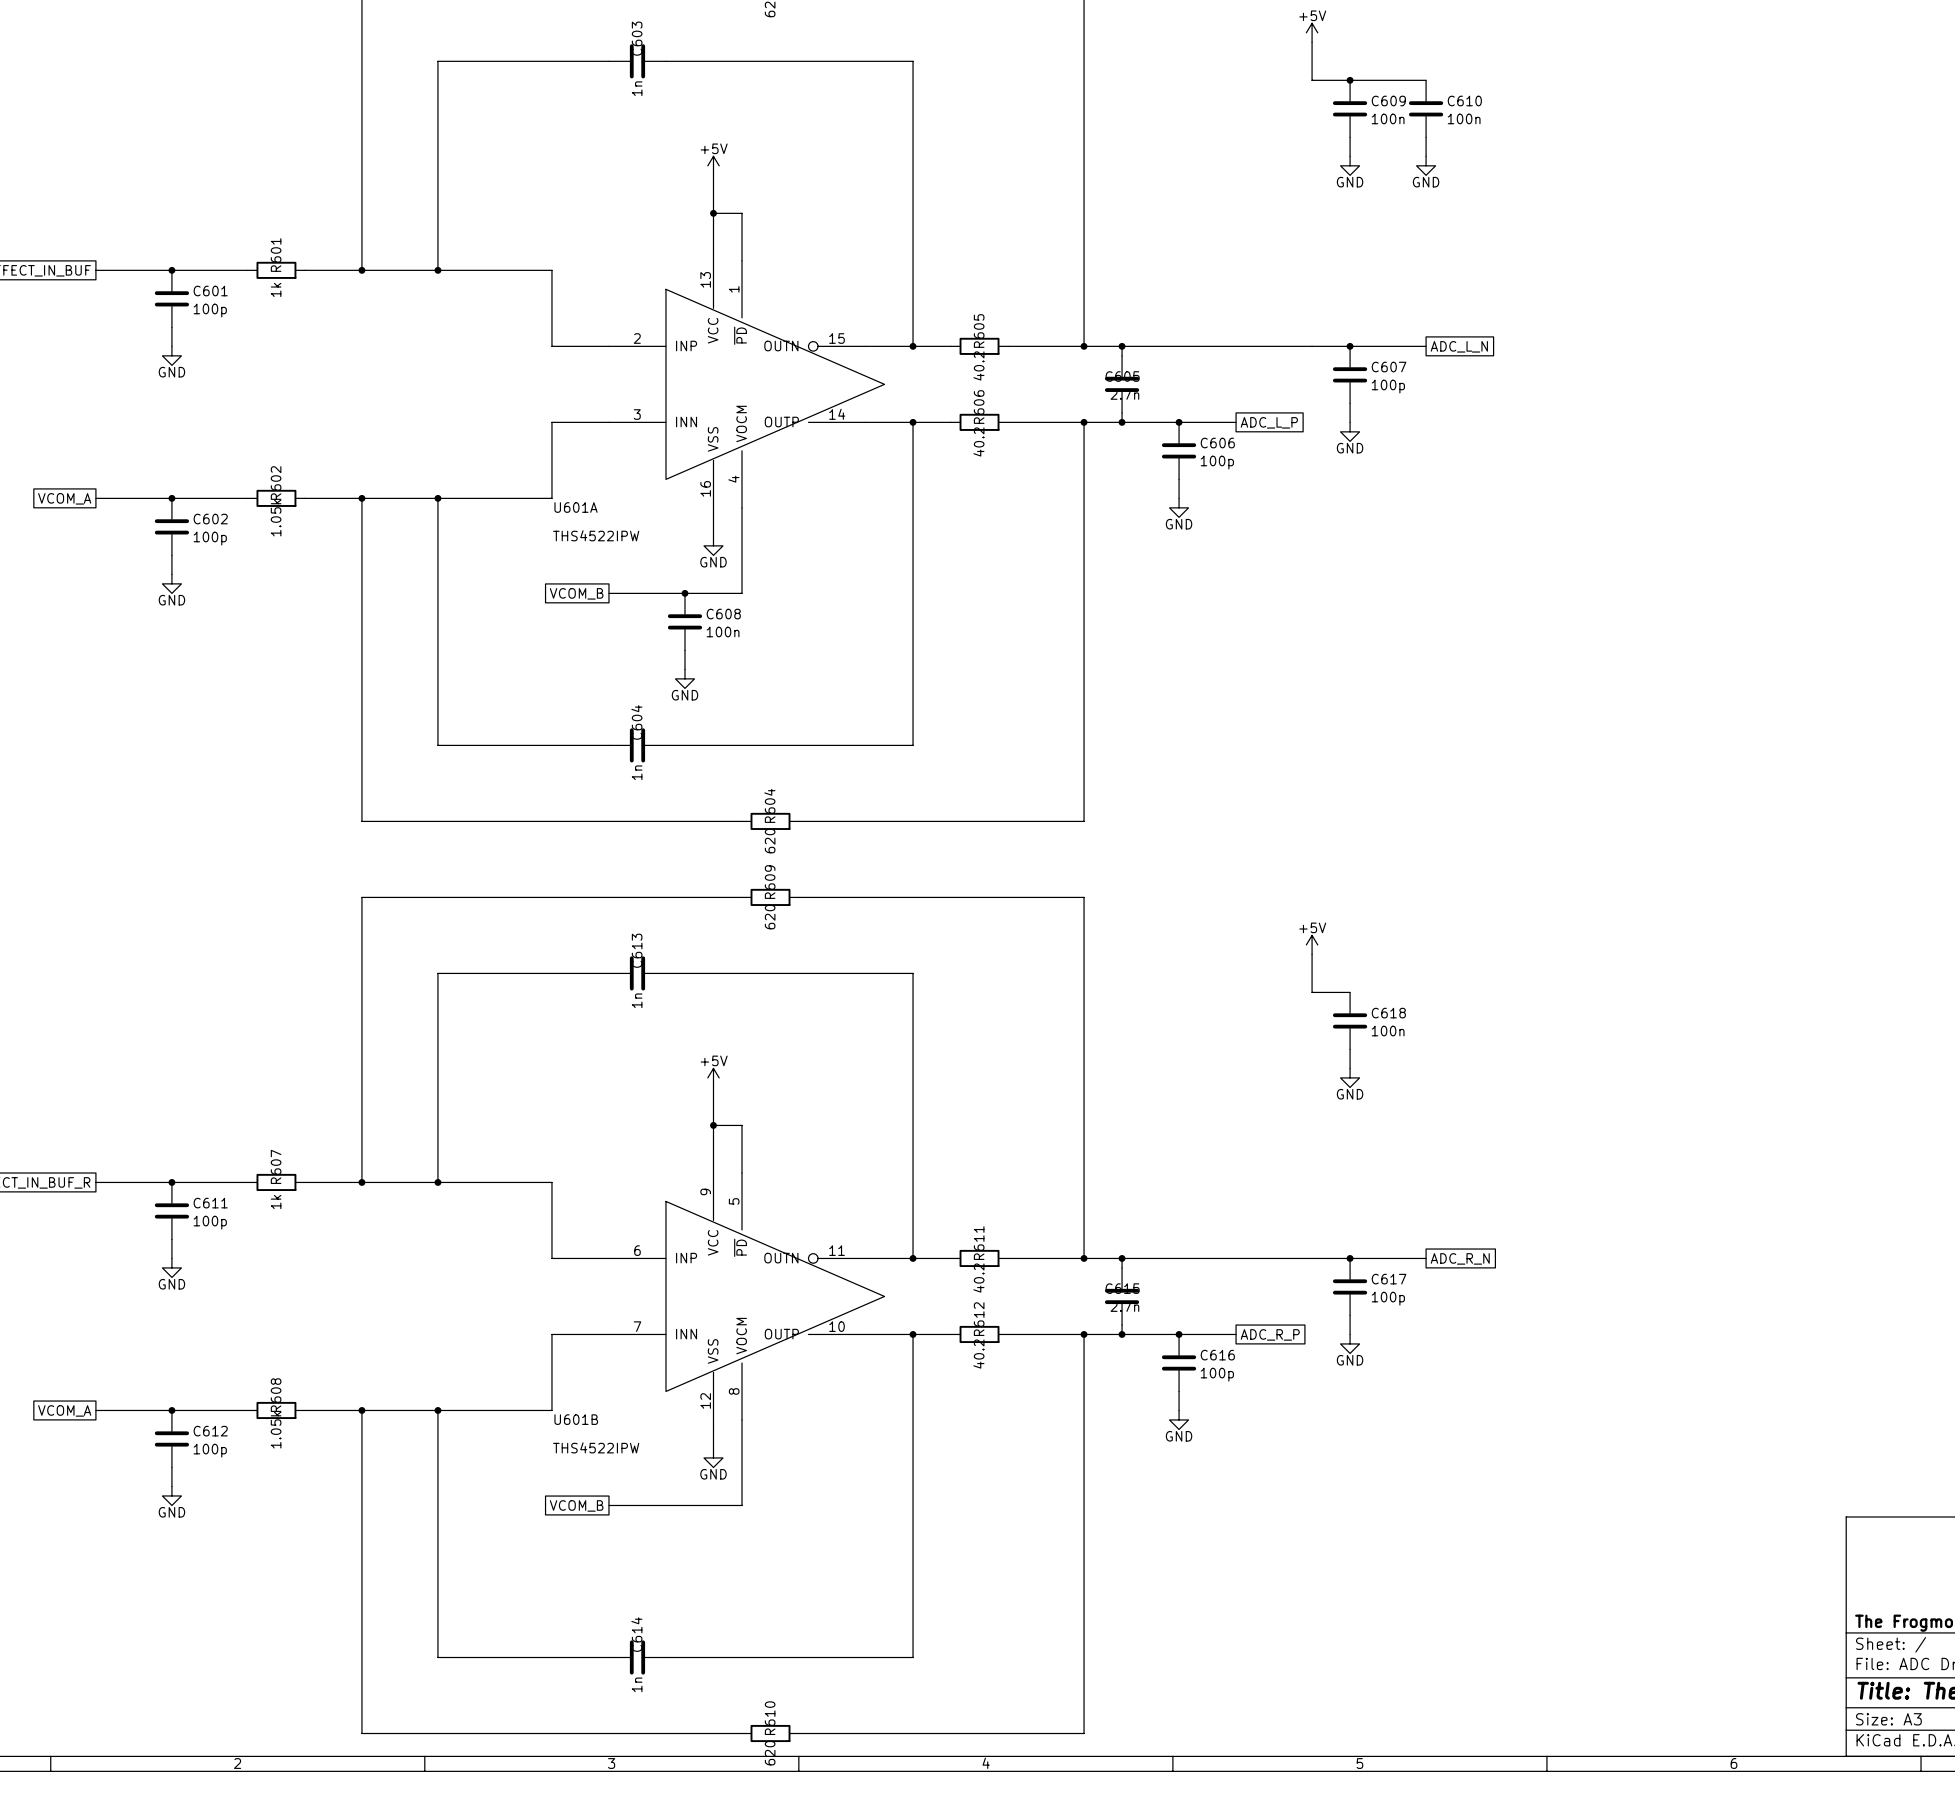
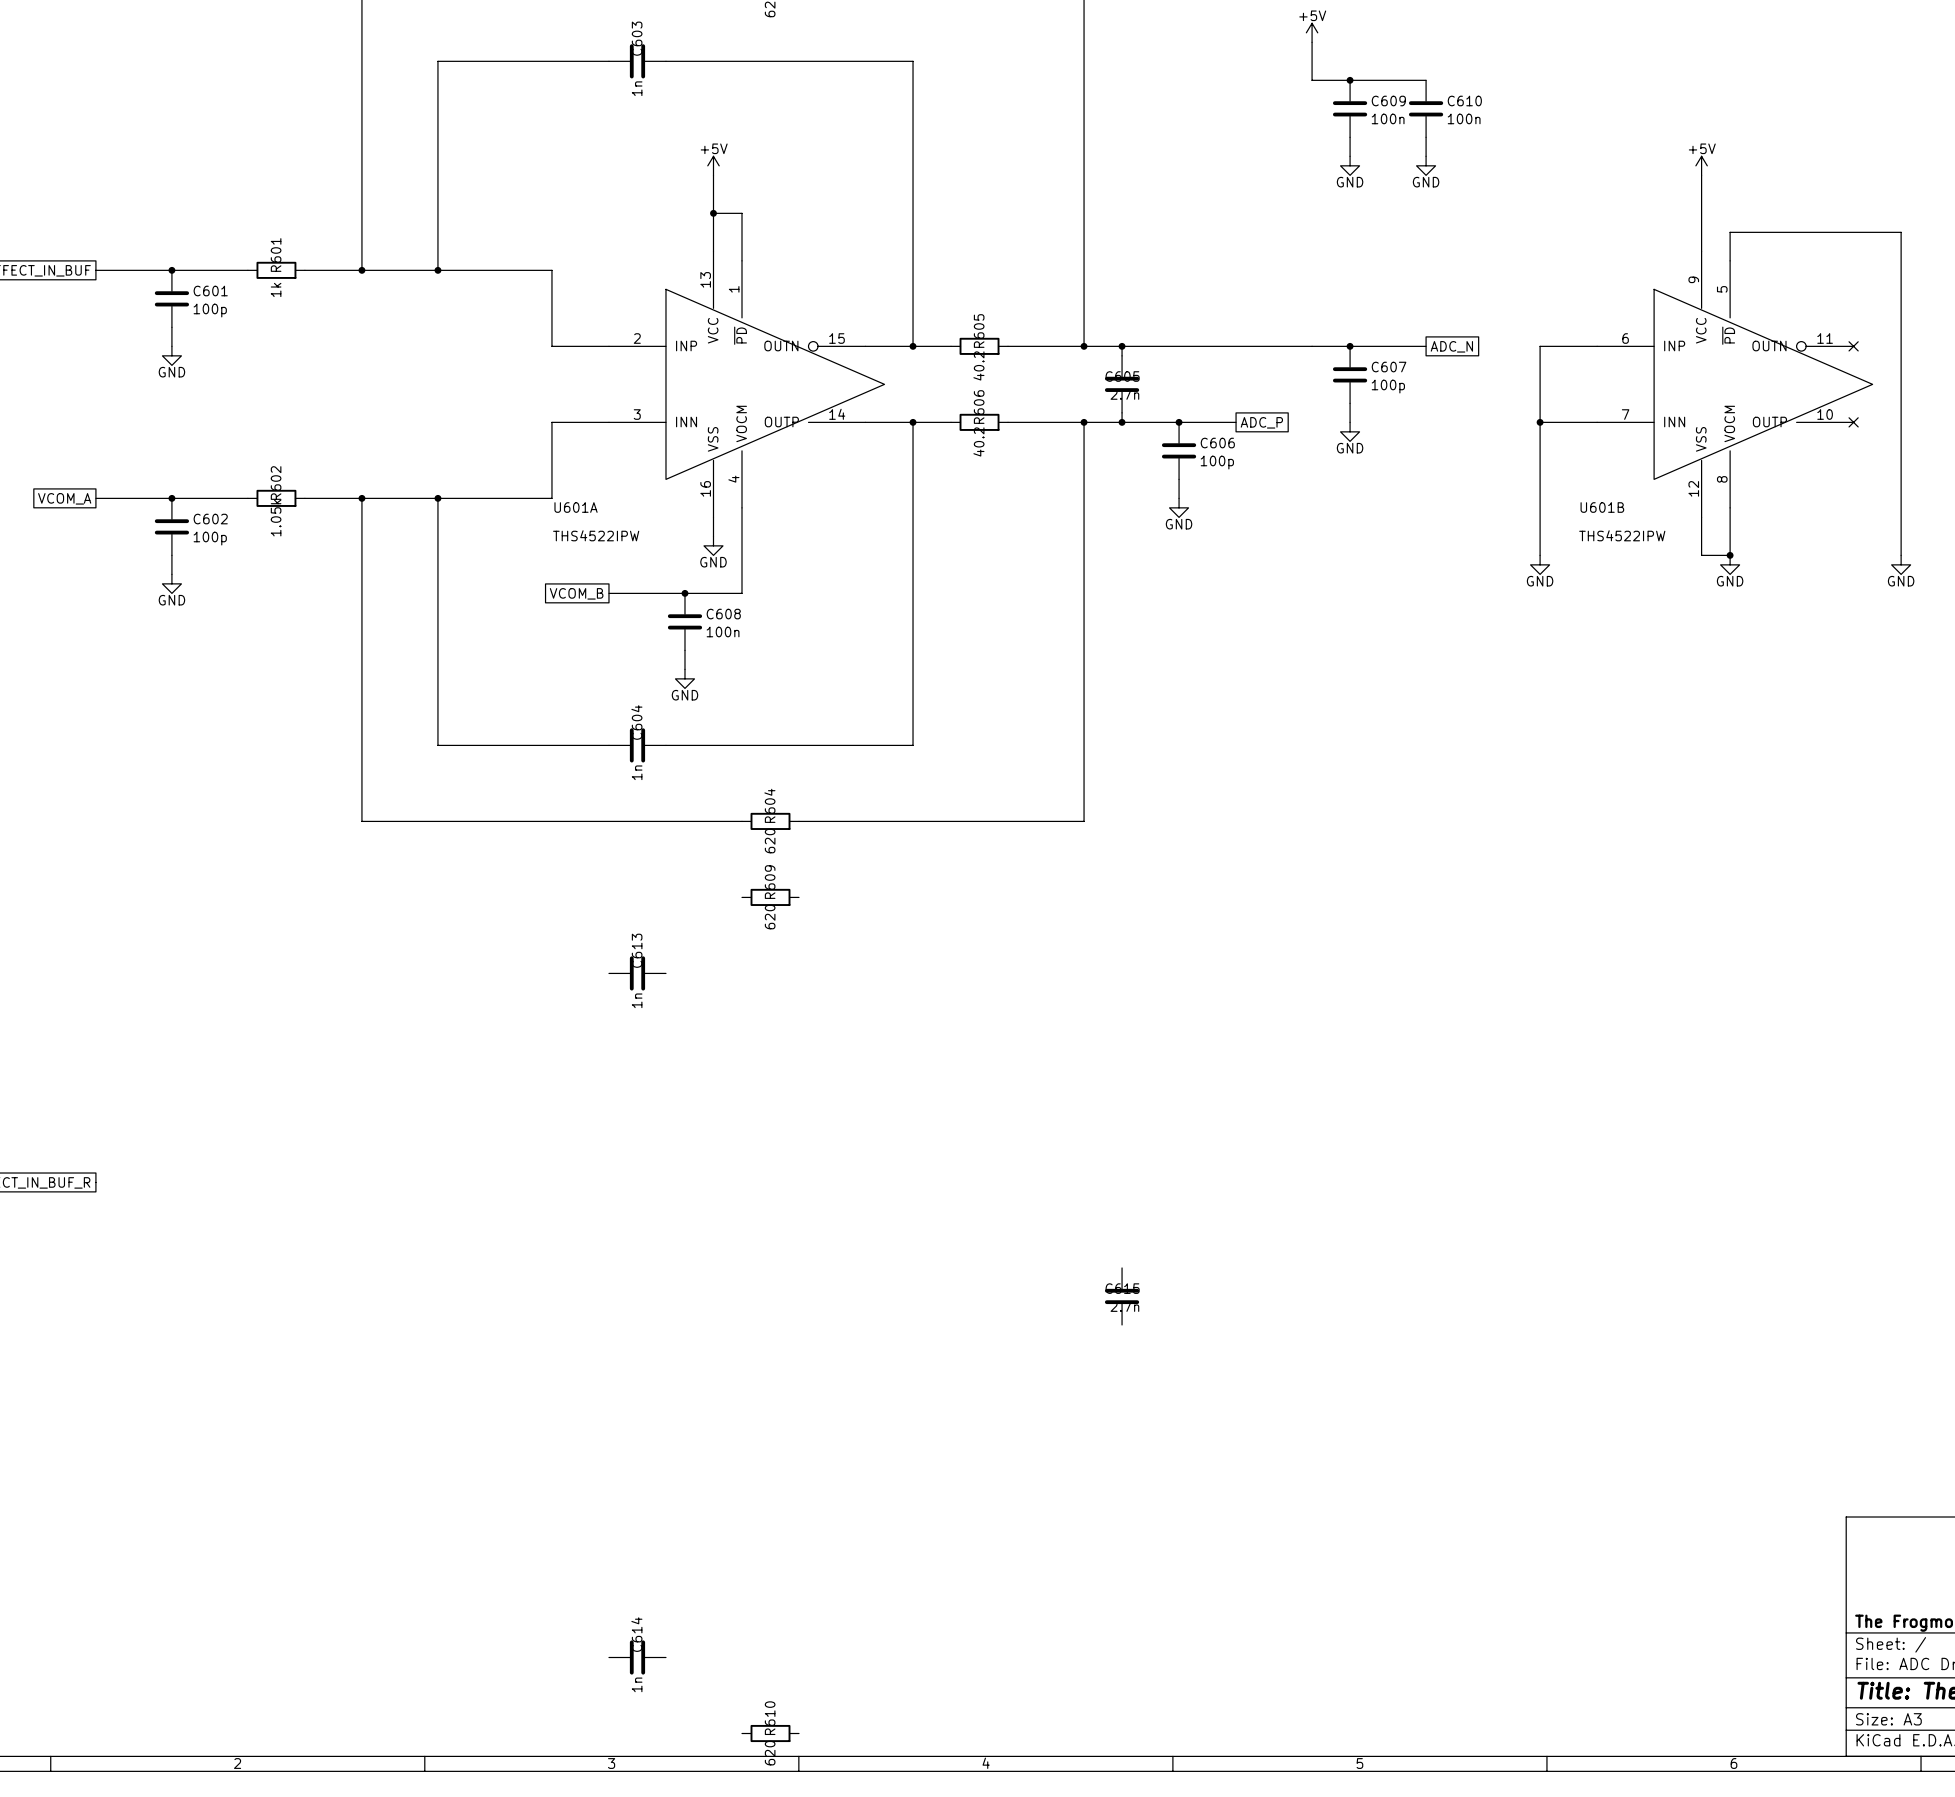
power symbol: none -> +5V (1701, 165)
wire: none -> (1701, 175) (1701, 251)
wire: none -> (1730, 260) (1730, 232) (1901, 232) (1901, 555)
global label: ADC_L_N (1459, 346) -> ADC_N (1451, 346)
wire: none -> (1597, 346) (1540, 346) (1540, 555)
no-connect mark: none -> (1853, 346)
global label: ADC_L_P (1269, 422) -> ADC_P (1261, 422)
wire: none -> (1540, 422) (1597, 422)
junction: none -> (1540, 422)
no-connect mark: none -> (1853, 422)
wire: none -> (1730, 507) (1730, 555) (1701, 555) (1701, 517)
junction: none -> (1730, 555)
power symbol: none -> GND (1540, 564)
power symbol: none -> GND (1730, 564)
power symbol: none -> GND (1901, 564)
wire: (741, 897) (361, 897) (361, 1182) -> none
wire: (799, 897) (1084, 897) (1084, 1258) -> none
power symbol: +5V (1312, 944) -> none
wire: (1312, 954) (1312, 992) (1350, 992) -> none
wire: (608, 973) (437, 973) (437, 1182) -> none
wire: (665, 973) (913, 973) (913, 1258) -> none
C618: 100n (1350, 1020) -> none
wire: (1350, 1049) (1350, 1068) -> none
power symbol: +5V (713, 1077) -> none
power symbol: GND (1350, 1077) -> none
wire: (713, 1087) (713, 1163) -> none
wire: (713, 1125) (741, 1125) (741, 1172) -> none
junction: (713, 1125) -> none
wire: (95, 1182) (247, 1182) -> none
junction: (171, 1182) -> none
R607: 1k (276, 1182) -> none
wire: (304, 1182) (551, 1182) (551, 1258) (608, 1258) -> none
junction: (361, 1182) -> none
junction: (437, 1182) -> none
C611: 100p (171, 1210) -> none
wire: (171, 1239) (171, 1258) -> none
wire: (865, 1258) (951, 1258) -> none
junction: (913, 1258) -> none
R611: 40.2 (979, 1258) -> none
wire: (1008, 1258) (1426, 1258) -> none
junction: (1084, 1258) -> none
wire: (1122, 1258) (1122, 1267) -> none
junction: (1122, 1258) -> none
junction: (1350, 1258) -> none
global label: ADC_R_N (1460, 1258) -> none
power symbol: GND (171, 1267) -> none
C617: 100p (1350, 1286) -> none
U601B position: (746, 1296) -> (1734, 384)
wire: (1350, 1315) (1350, 1334) -> none
wire: (1122, 1324) (1122, 1334) -> none
wire: (608, 1334) (551, 1334) (551, 1410) (304, 1410) -> none
wire: (865, 1334) (951, 1334) -> none
wire: (913, 1334) (913, 1657) (665, 1657) -> none
junction: (913, 1334) -> none
R612: 40.2 (979, 1334) -> none
wire: (1008, 1334) (1236, 1334) -> none
wire: (1084, 1334) (1084, 1733) (799, 1733) -> none
junction: (1084, 1334) -> none
junction: (1122, 1334) -> none
junction: (1179, 1334) -> none
global label: ADC_R_P (1270, 1334) -> none
power symbol: GND (1350, 1343) -> none
C616: 100p (1179, 1362) -> none
wire: (1179, 1391) (1179, 1410) -> none
global label: VCOM_A (64, 1410) -> none
wire: (95, 1410) (247, 1410) -> none
junction: (171, 1410) -> none
R608: 1.05k (276, 1410) -> none
wire: (361, 1410) (361, 1733) (741, 1733) -> none
junction: (361, 1410) -> none
wire: (437, 1410) (437, 1657) (608, 1657) -> none
junction: (437, 1410) -> none
U601B name position: U601B (576, 1419) -> U601B (1602, 507)
wire: (741, 1419) (741, 1505) (608, 1505) -> none
power symbol: GND (1179, 1419) -> none
wire: (713, 1429) (713, 1448) -> none
C612: 100p (171, 1438) -> none
U601B value position: THS4522IPW (596, 1447) -> THS4522IPW (1622, 535)
power symbol: GND (713, 1457) -> none
wire: (171, 1467) (171, 1486) -> none
power symbol: GND (171, 1495) -> none
global label: VCOM_B (576, 1505) -> none

